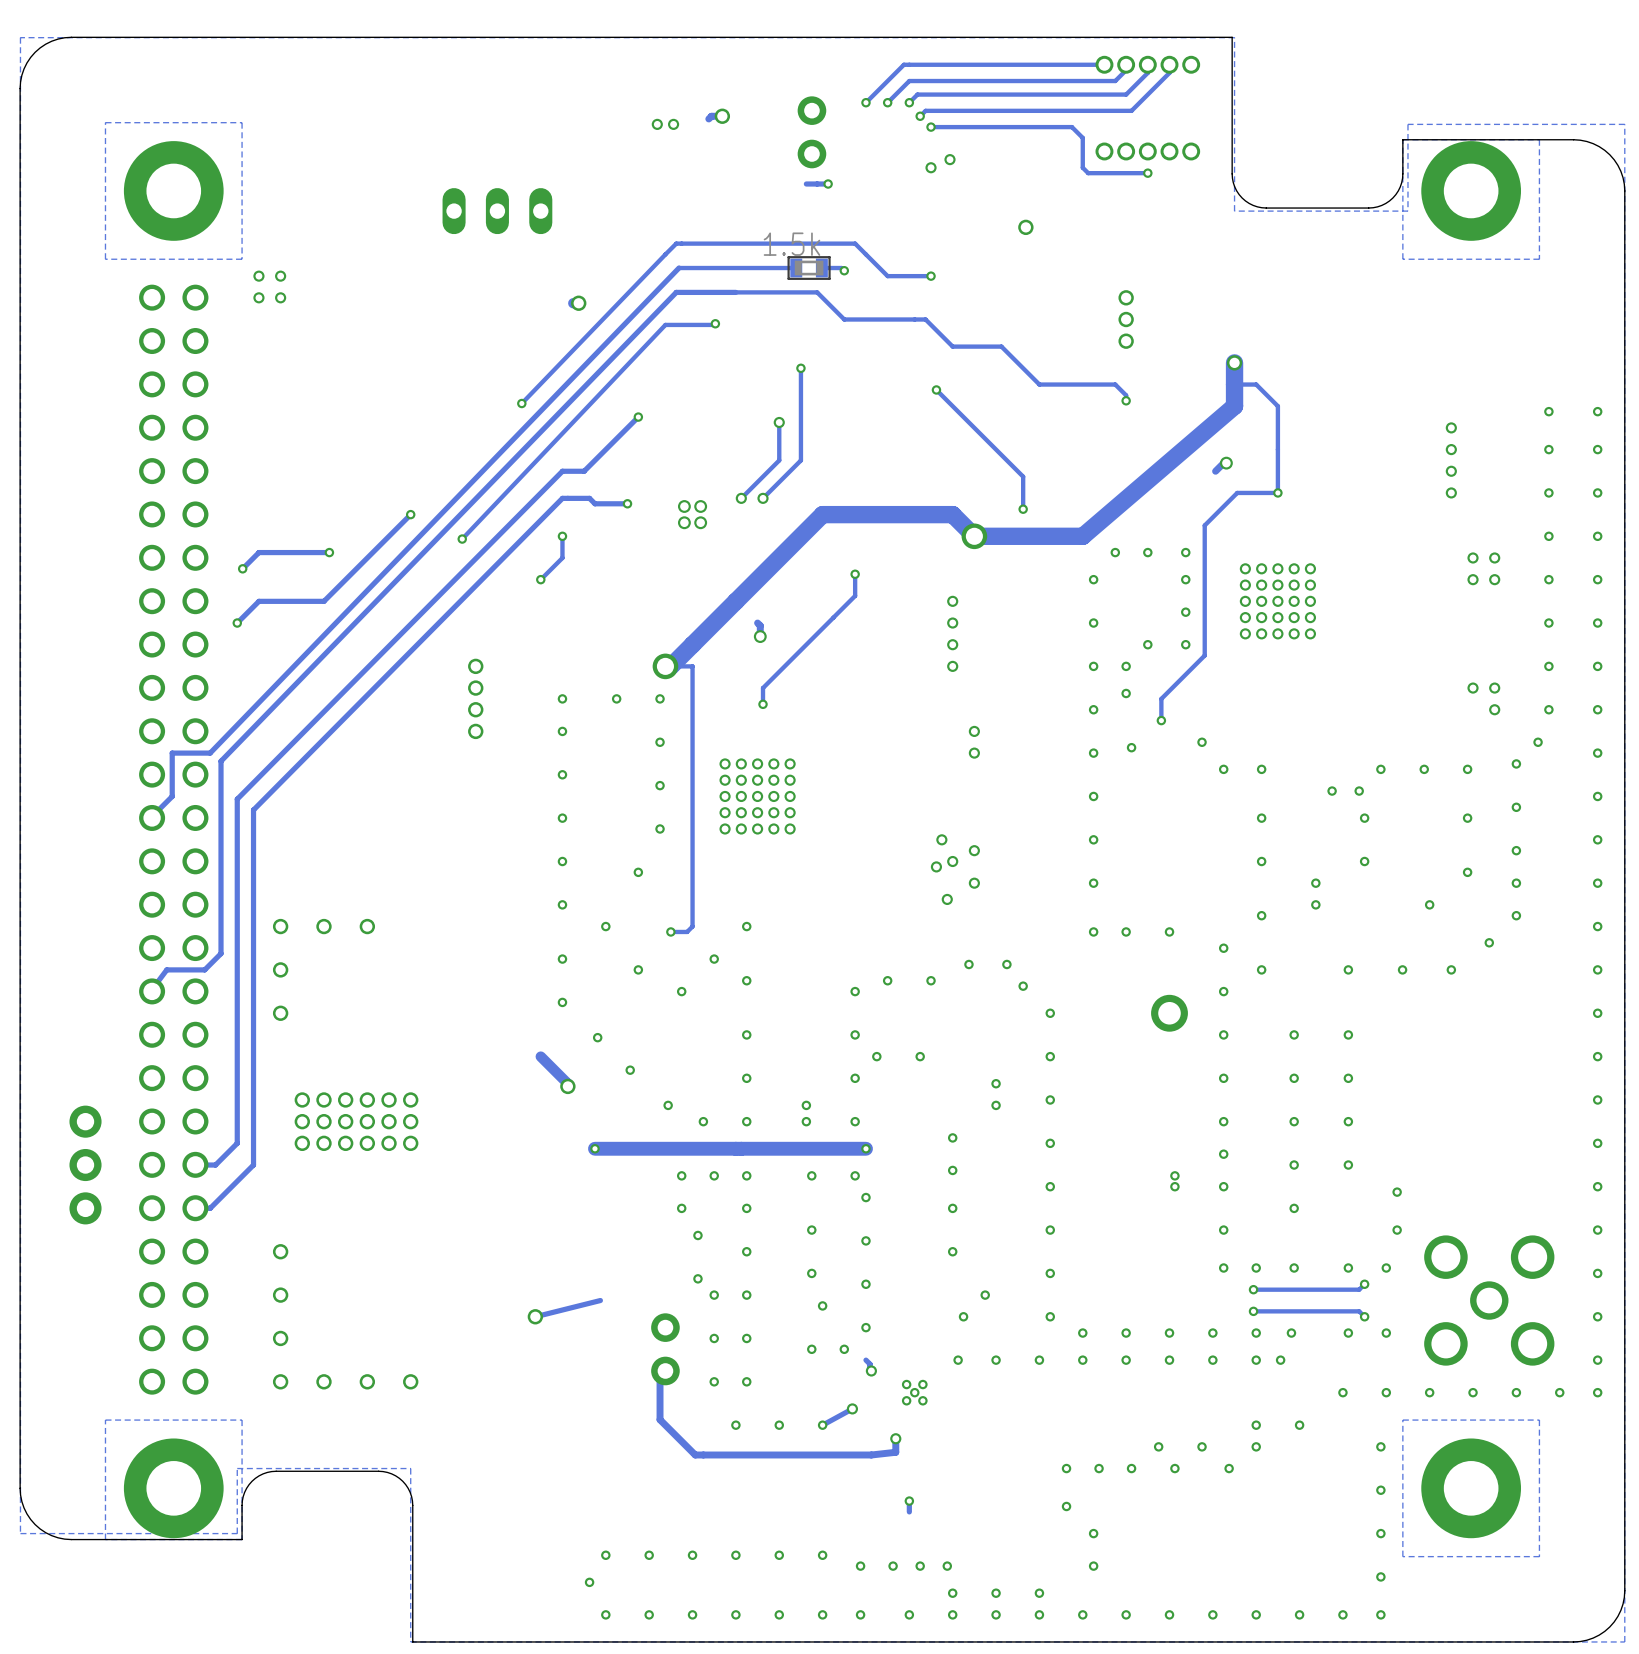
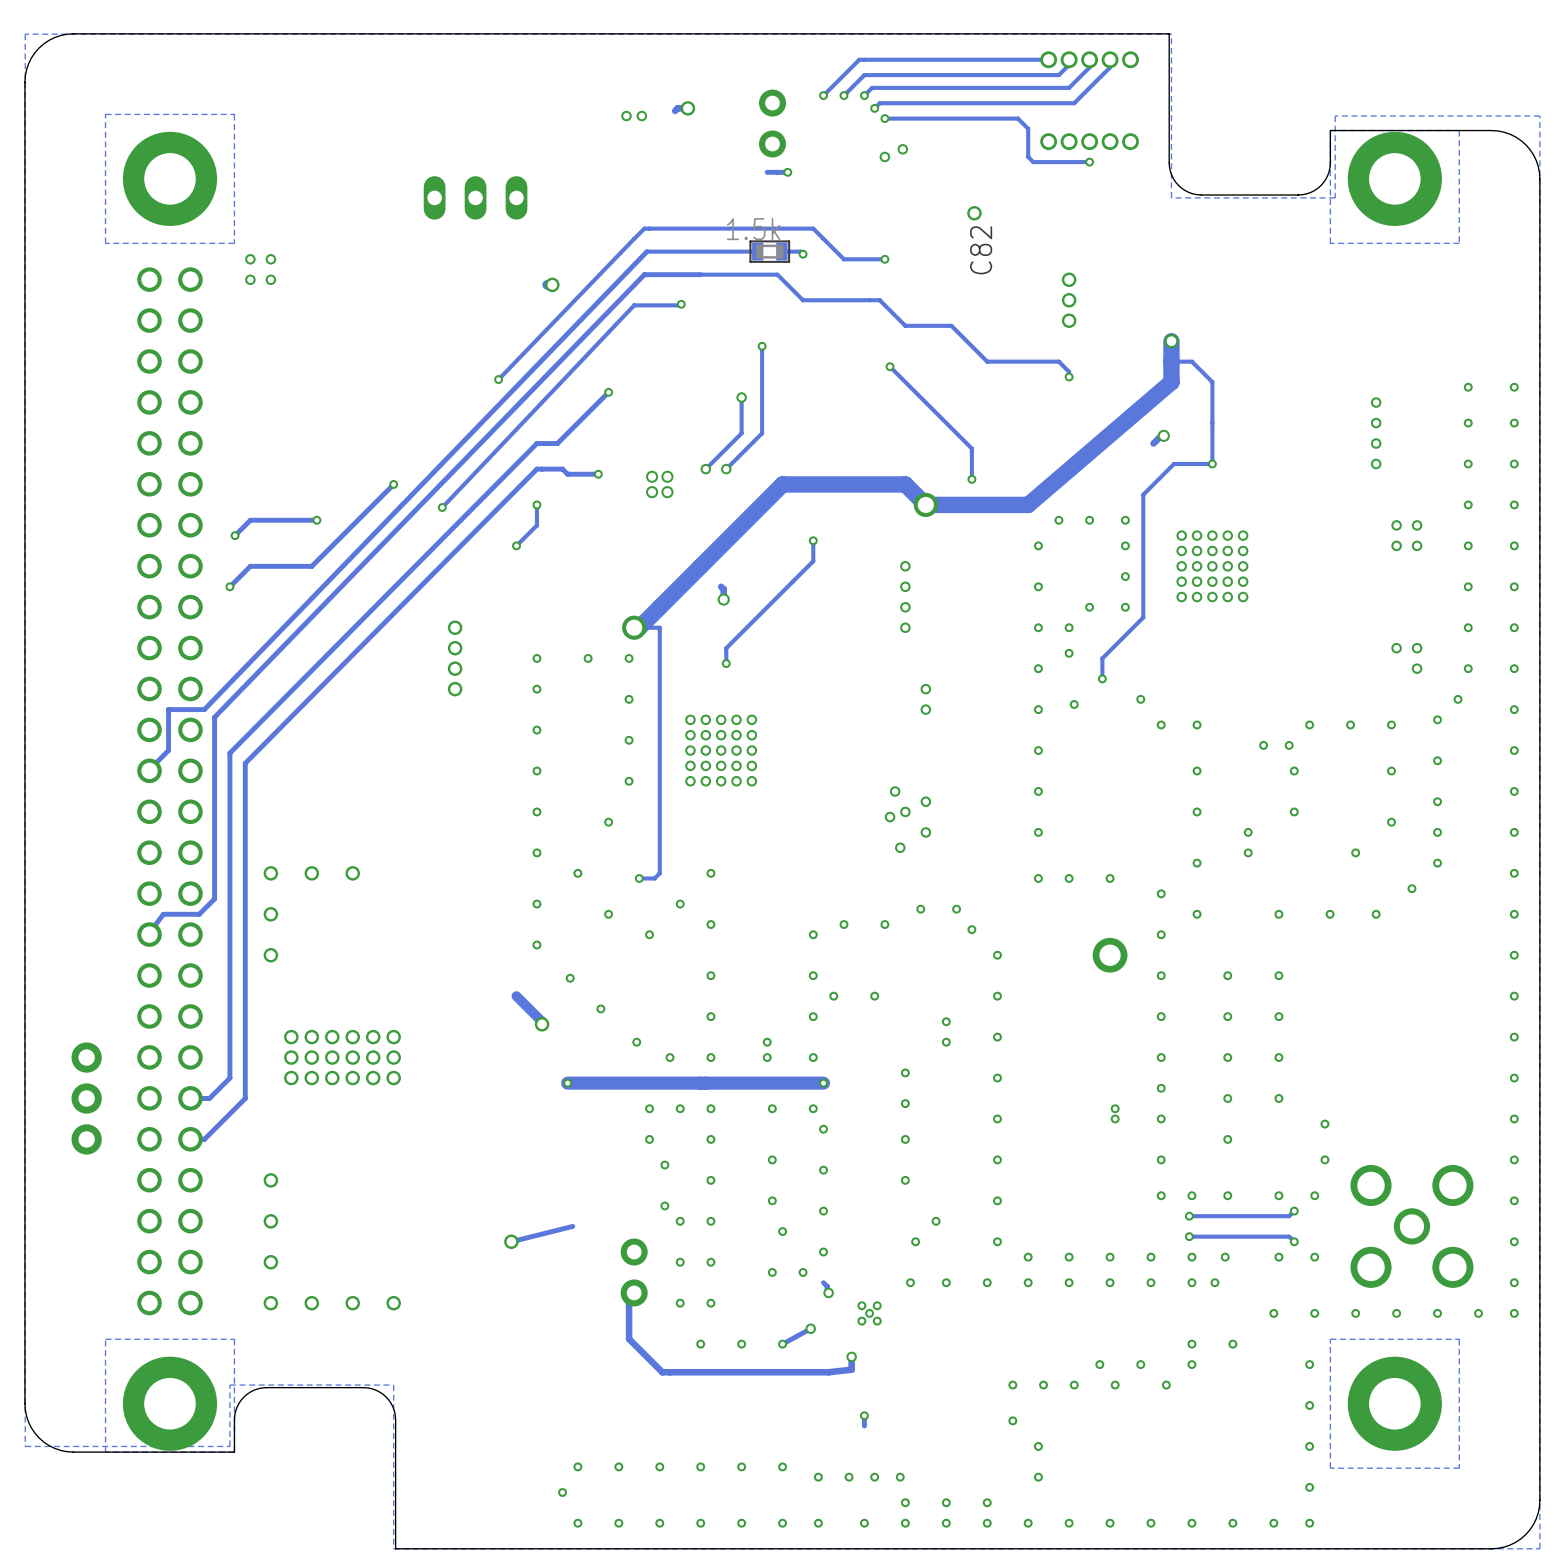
C82: none -> (981, 250)

